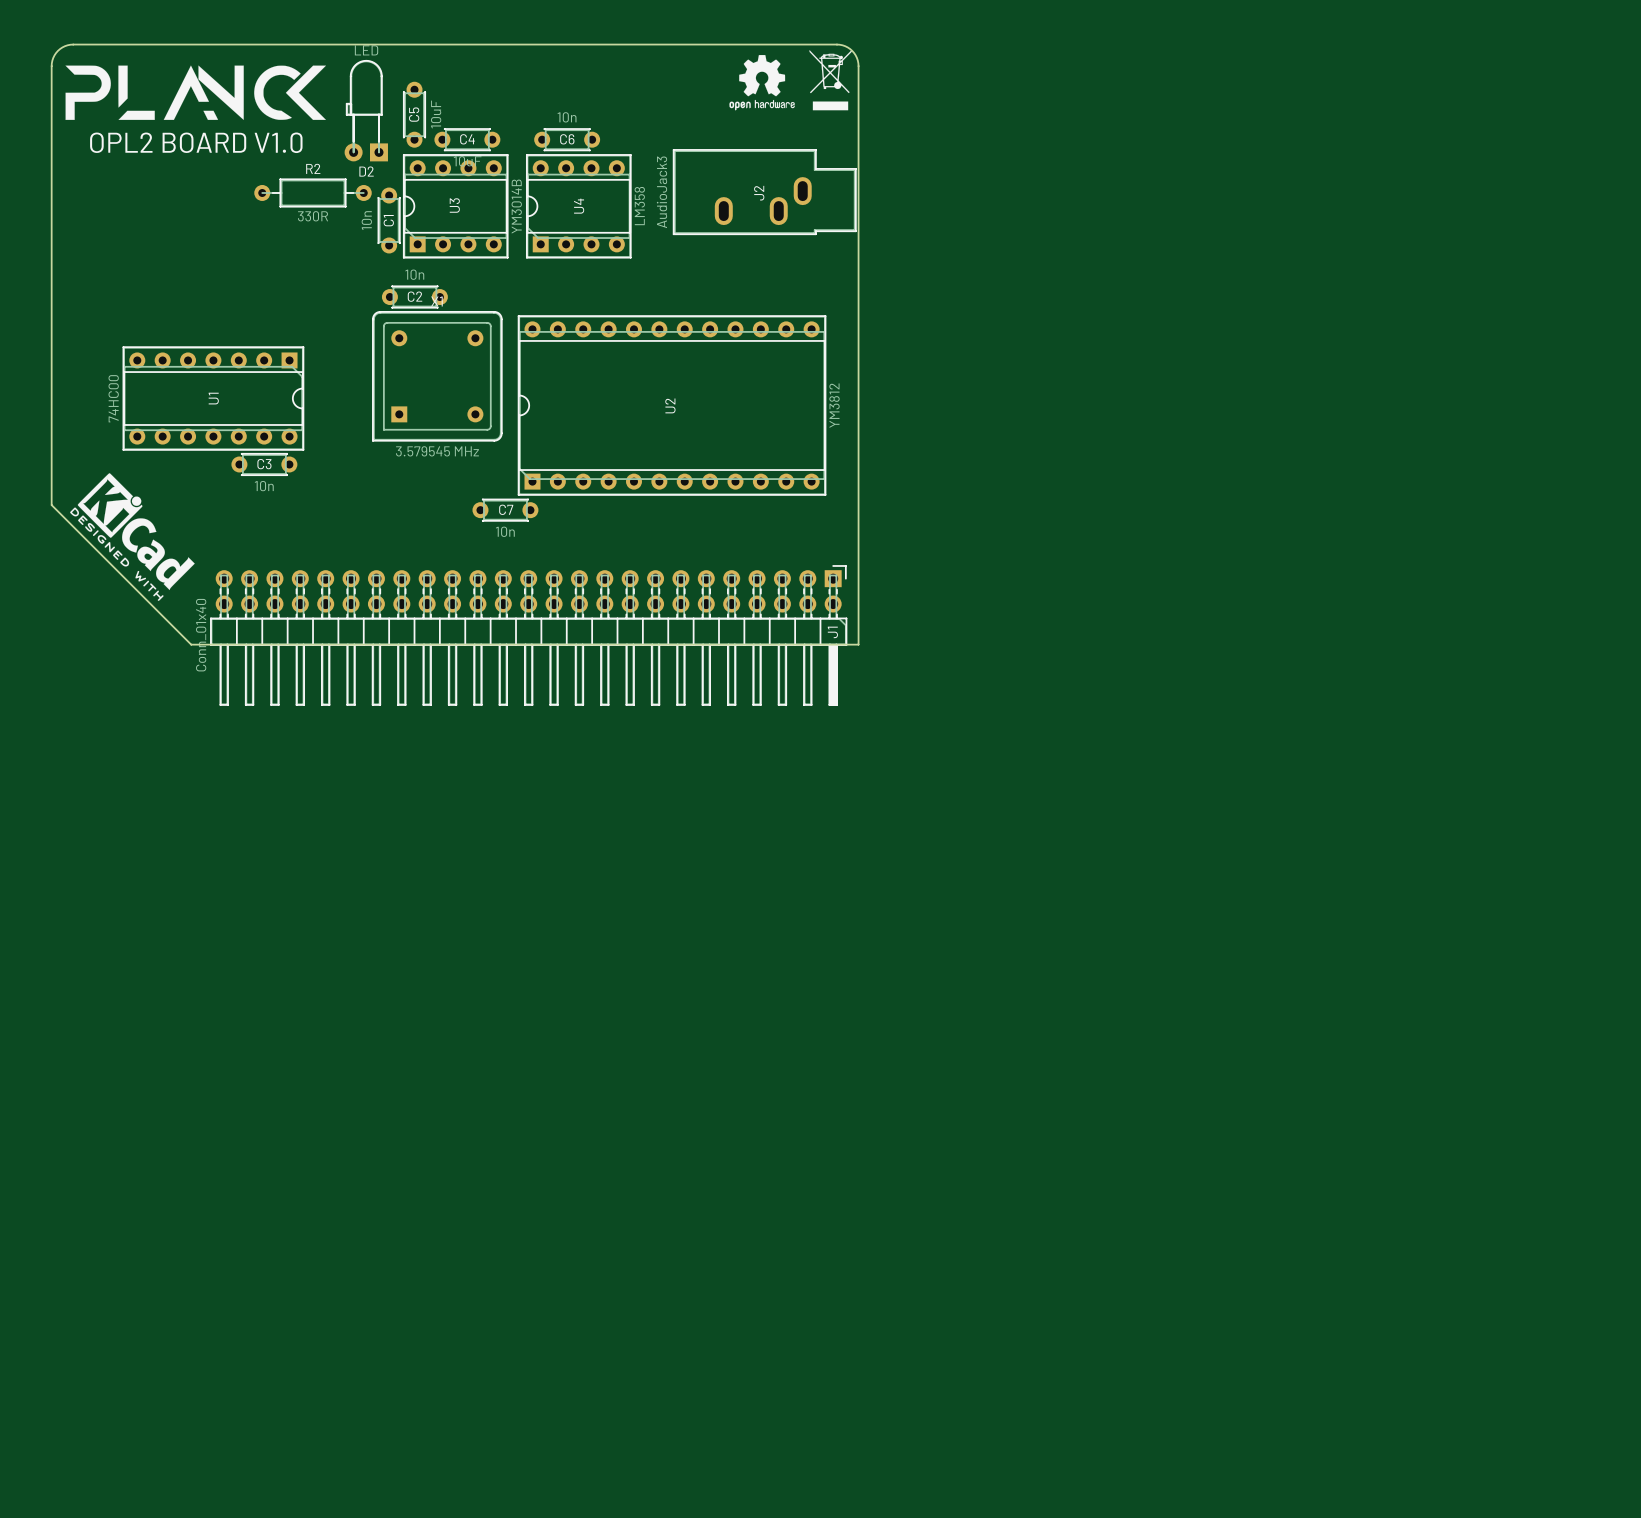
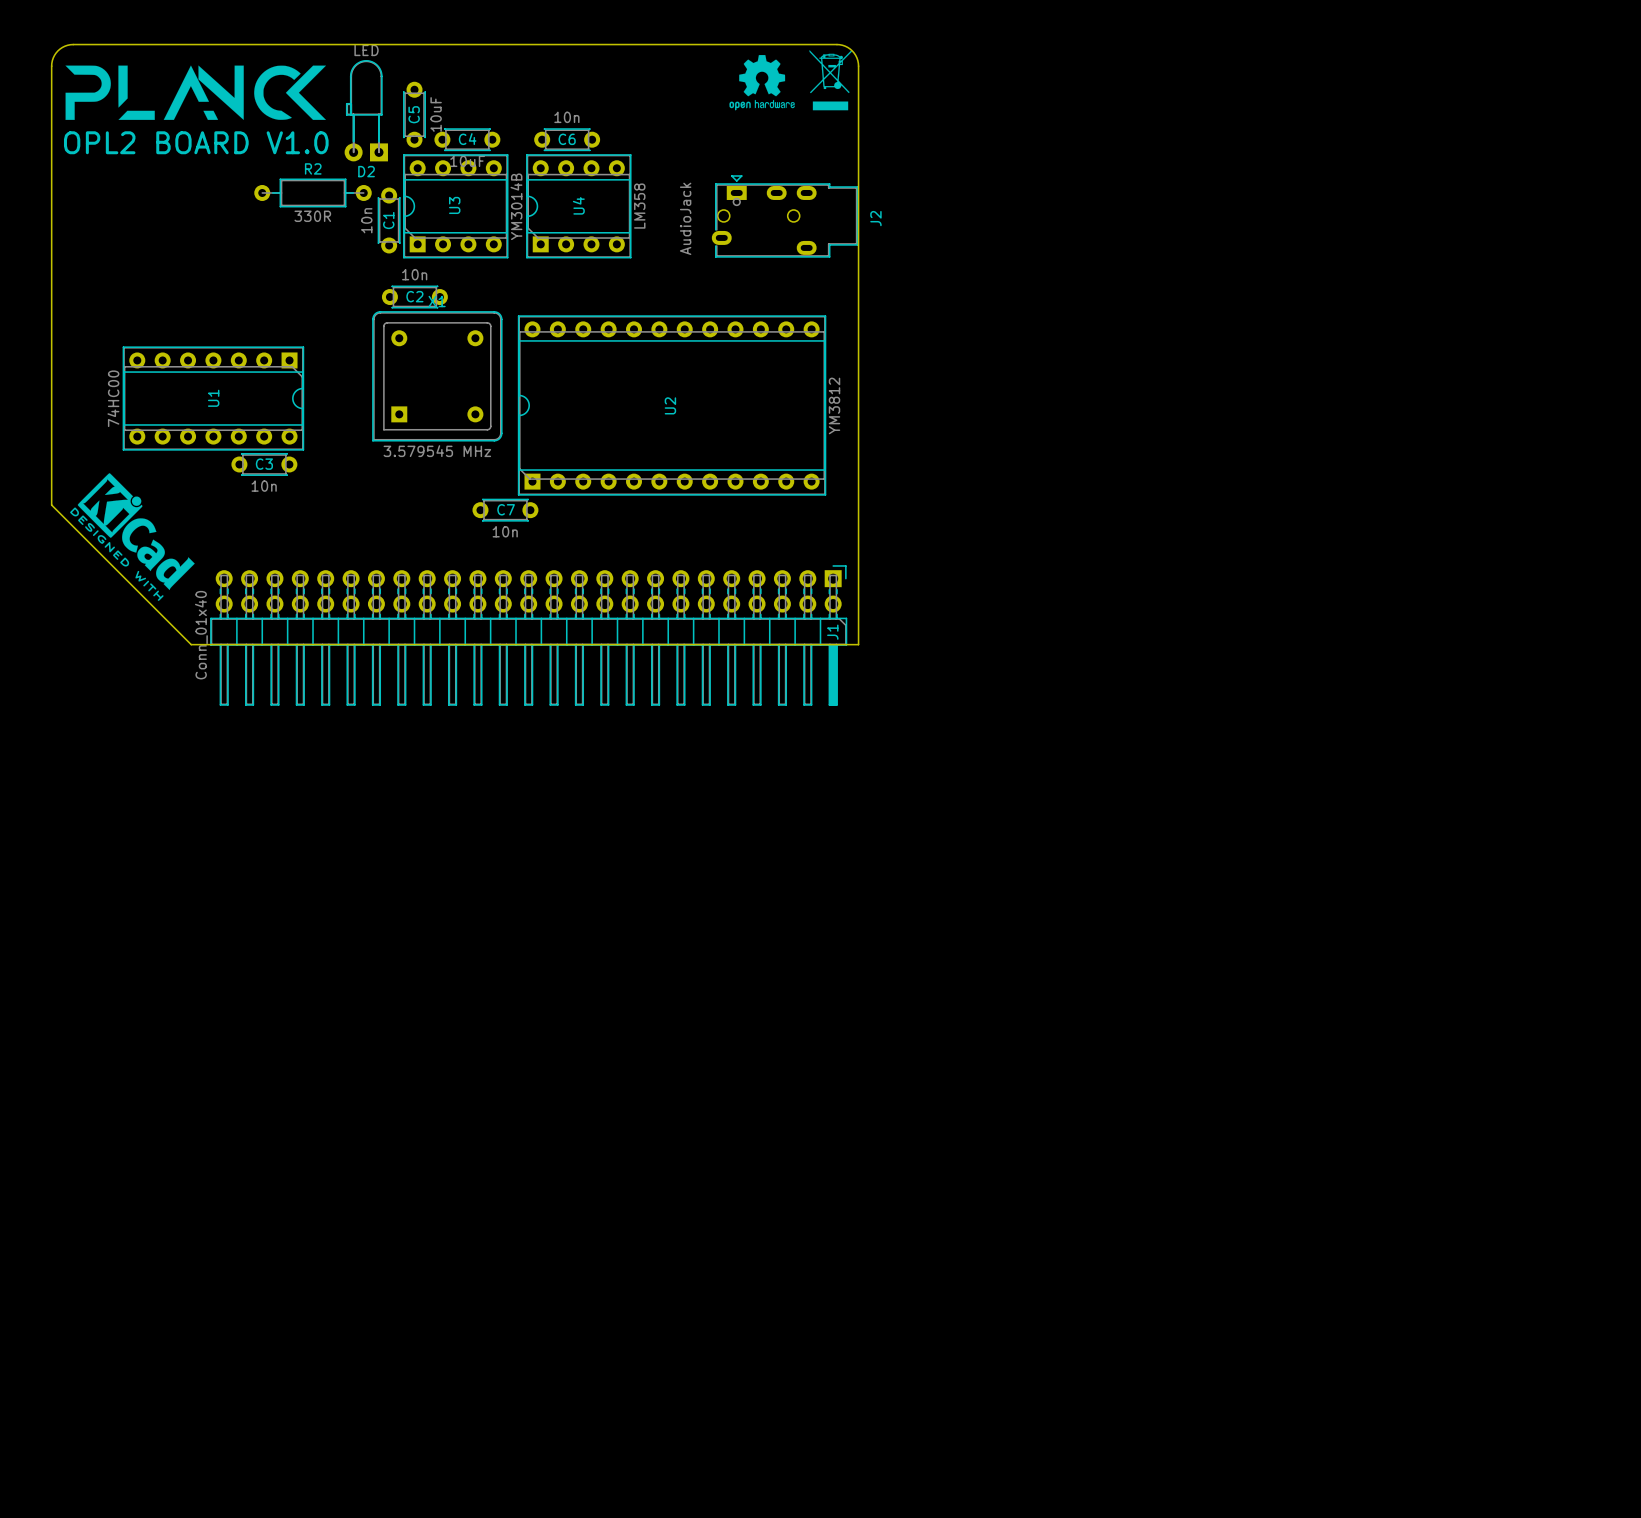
J2 footprint: [673, 149, 857, 235] -> [711, 175, 859, 258]
J2 value: AudioJack3 (661, 192) -> AudioJack (685, 218)
J2 name position: J2 (759, 193) -> J2 (875, 218)

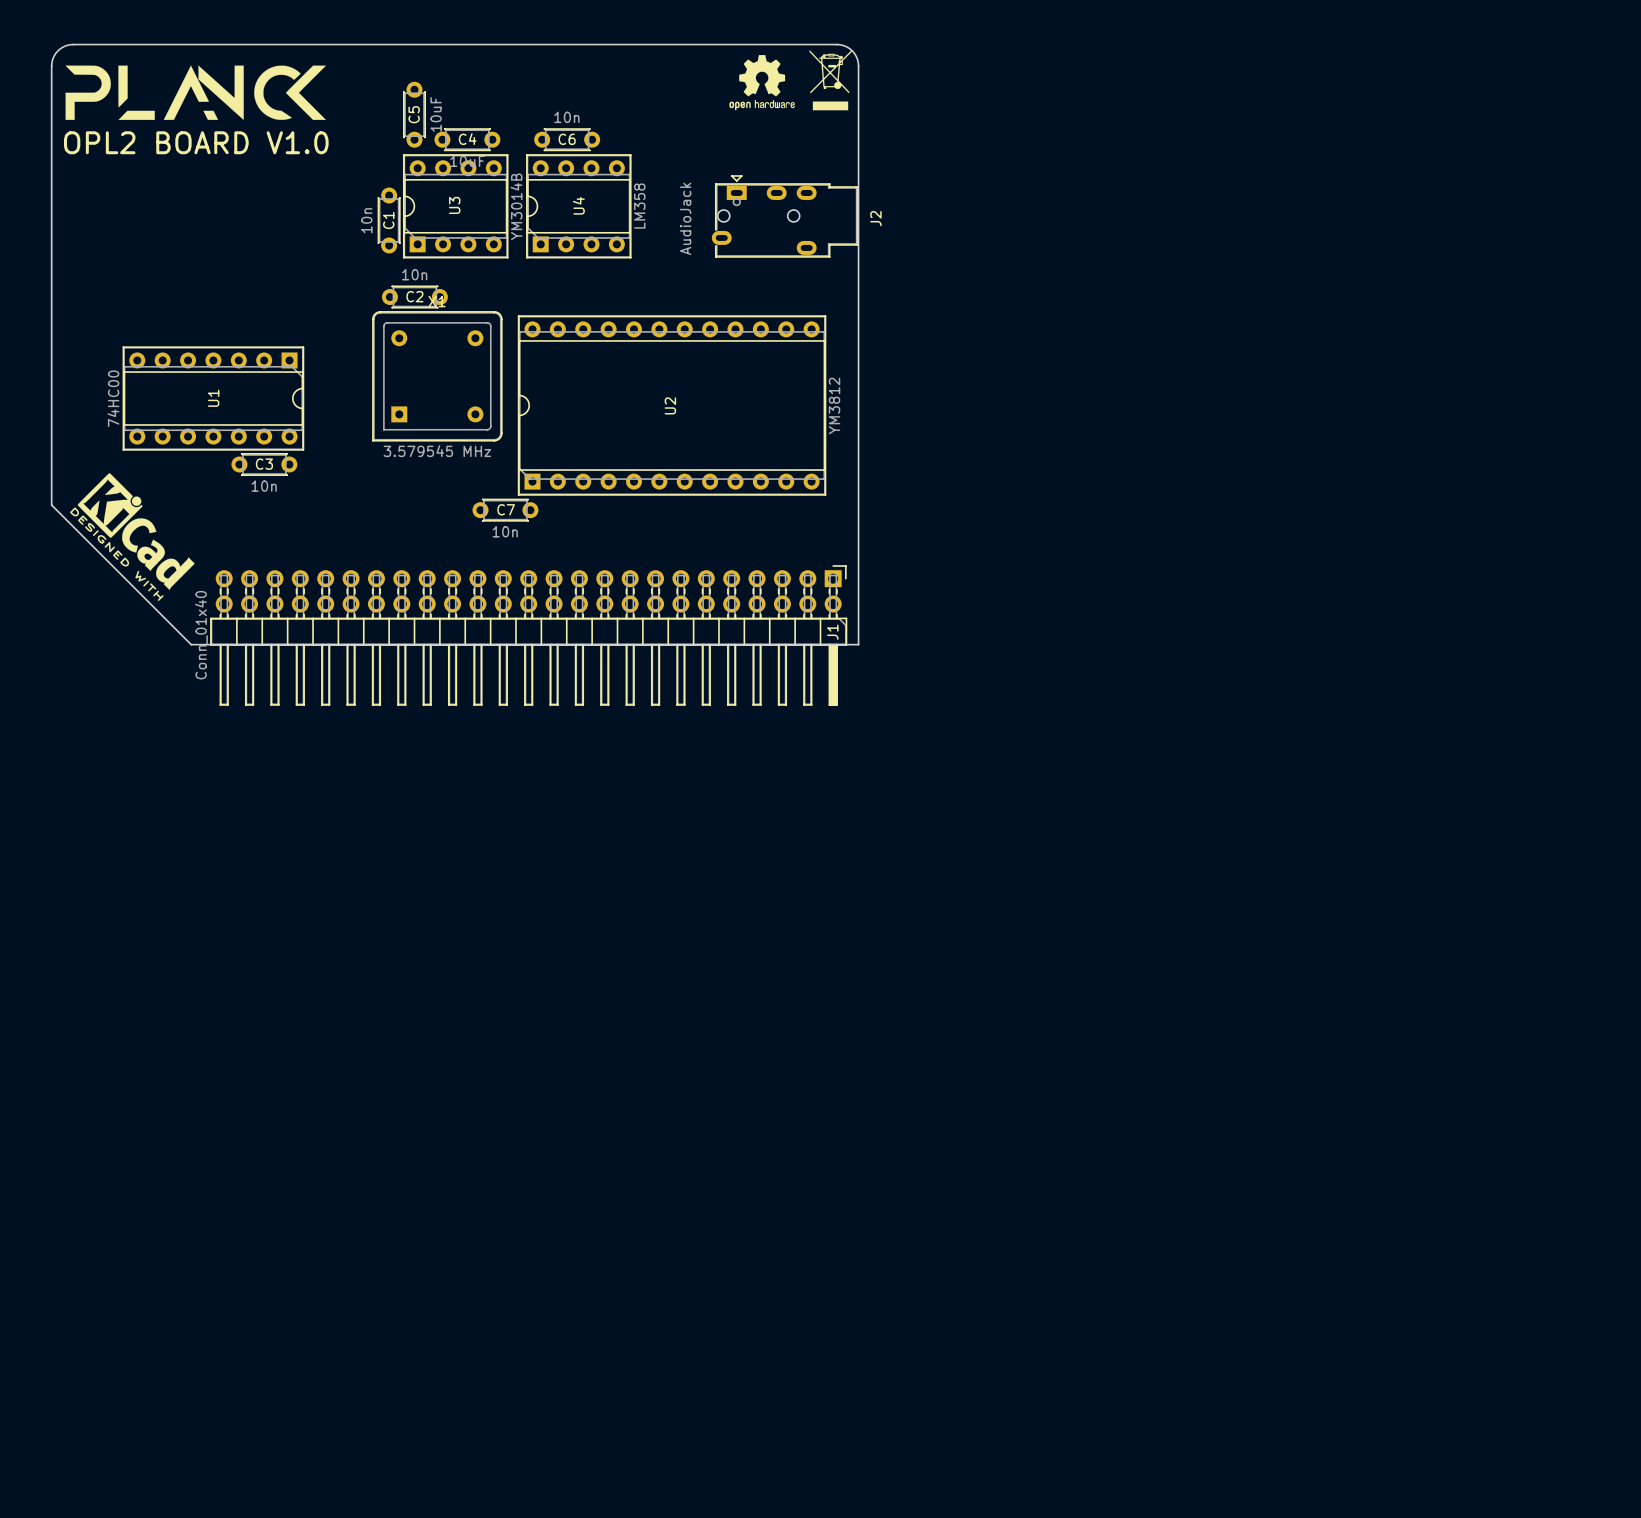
D2: LED (366, 110) -> none
R2: 330R (313, 192) -> none

